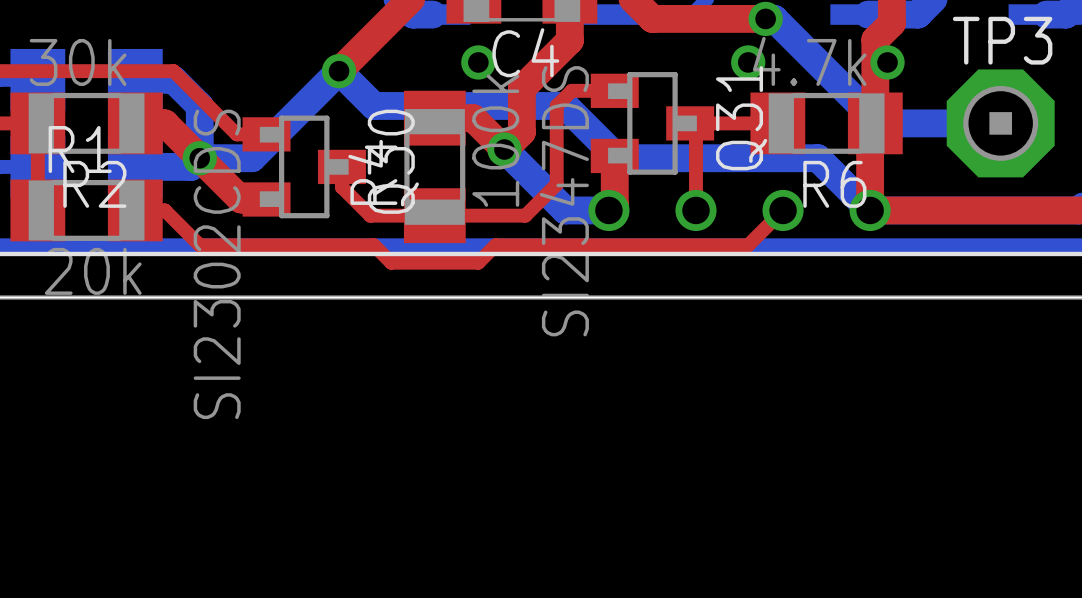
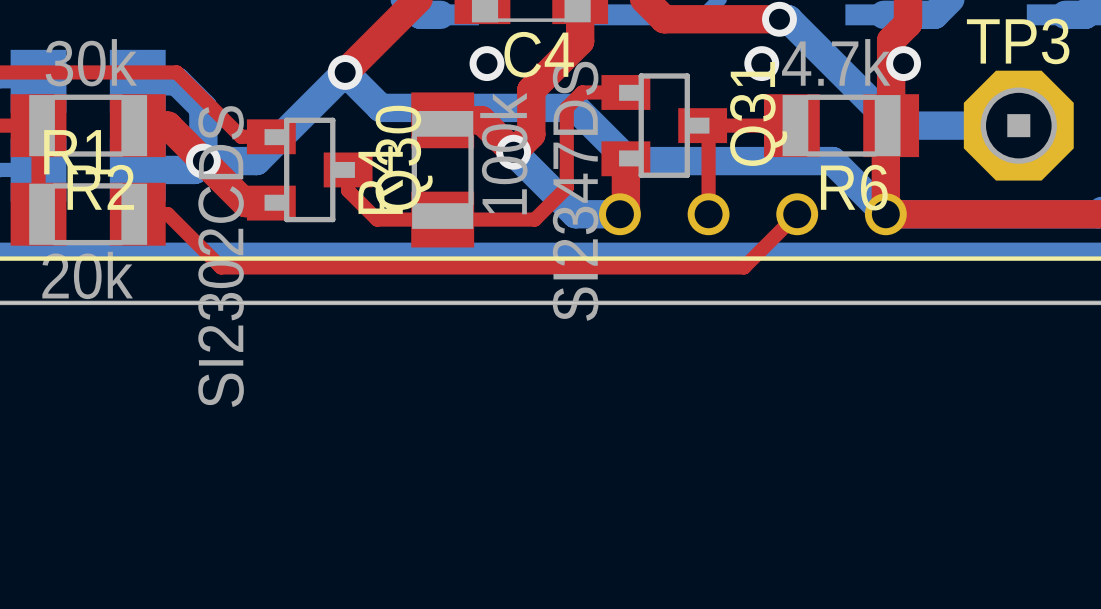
top track: (199, 245) (373, 245) (391, 262) -> (203, 249) (221, 267) (398, 267)
top track: (748, 245) (495, 245) (478, 262) -> (761, 249) (744, 267) (487, 267)

